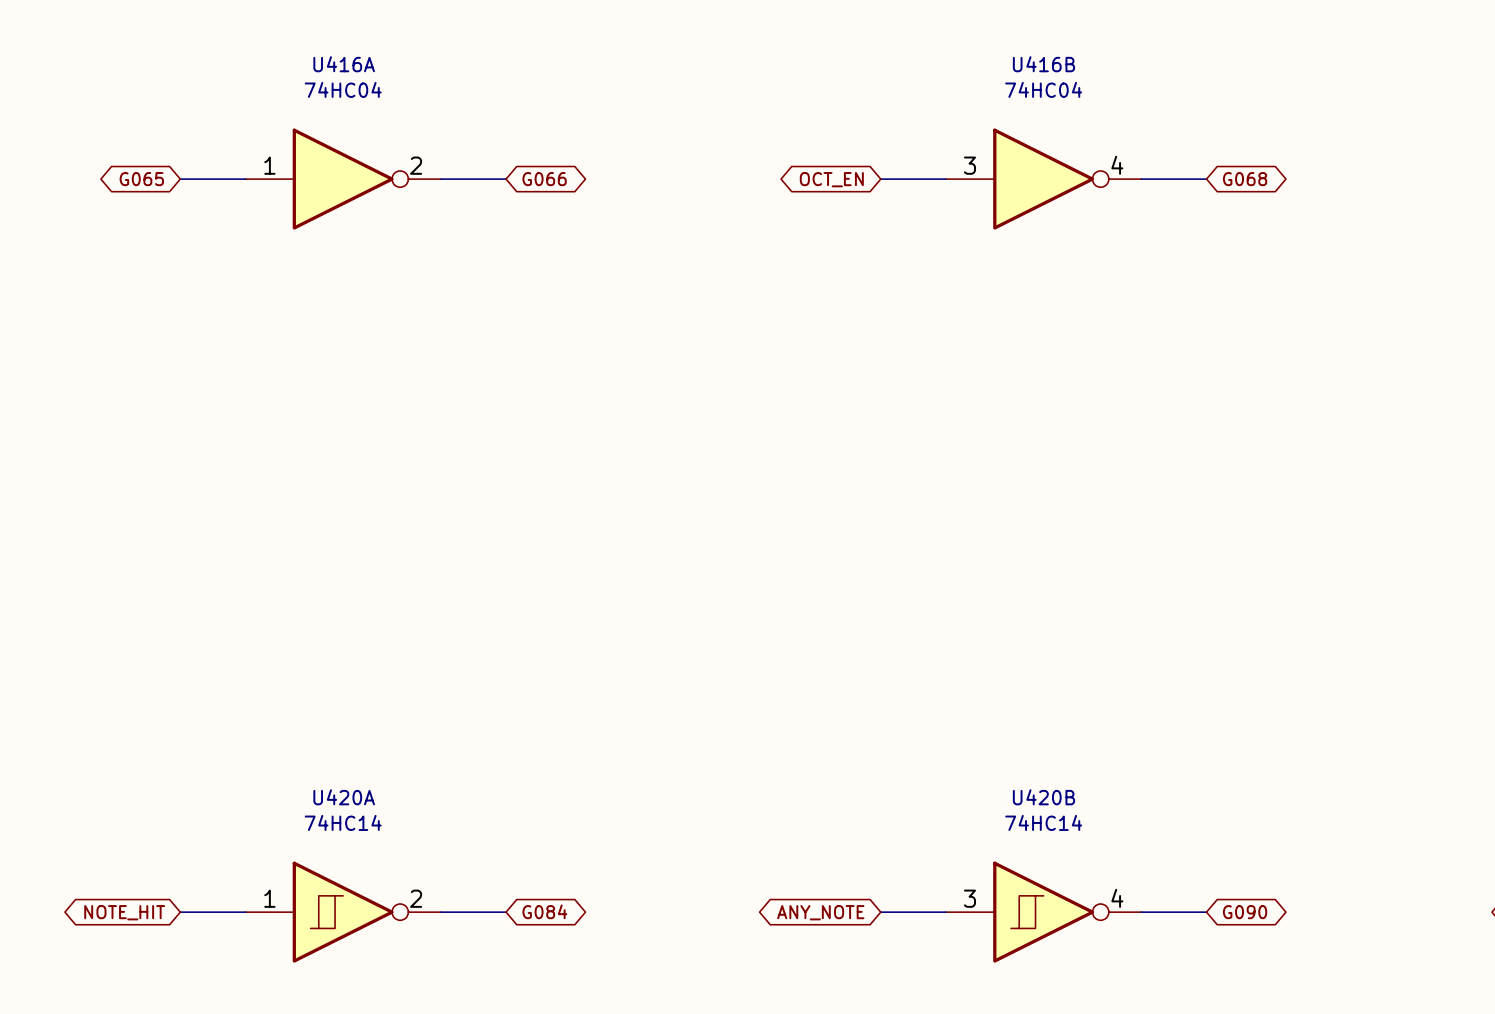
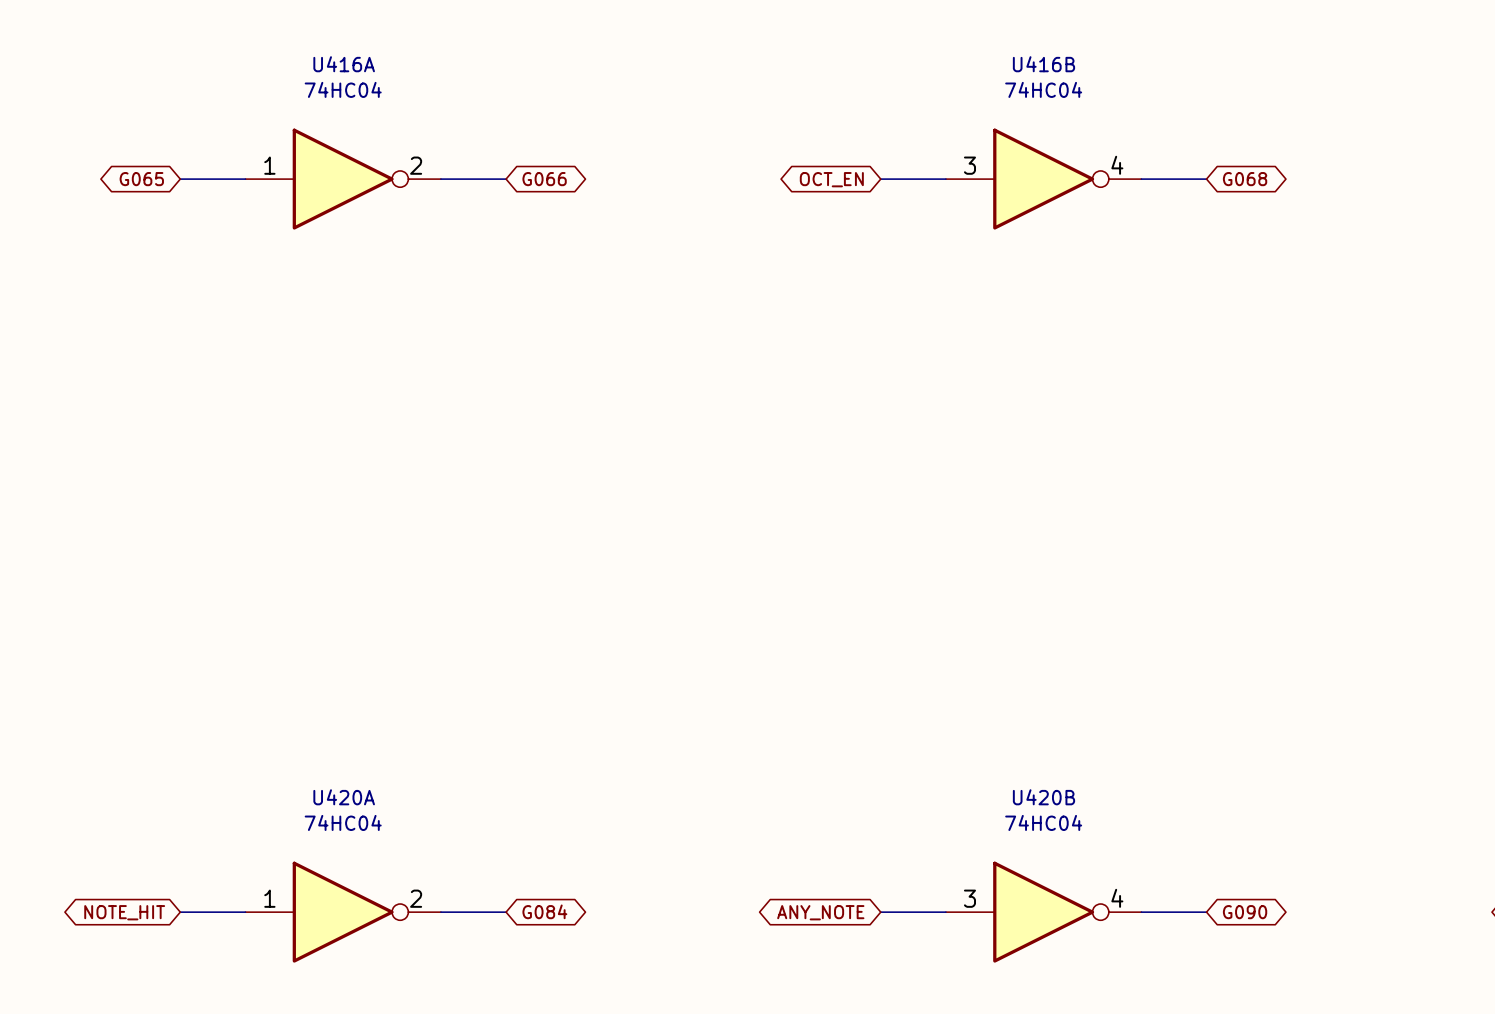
U420A value: 74HC14 (343, 822) -> 74HC04 (343, 822)
U420B value: 74HC14 (1043, 822) -> 74HC04 (1043, 822)
U420A symbol: [245, 861, 441, 963] -> [245, 861, 441, 963]
U420B symbol: [945, 861, 1142, 963] -> [945, 861, 1142, 963]

